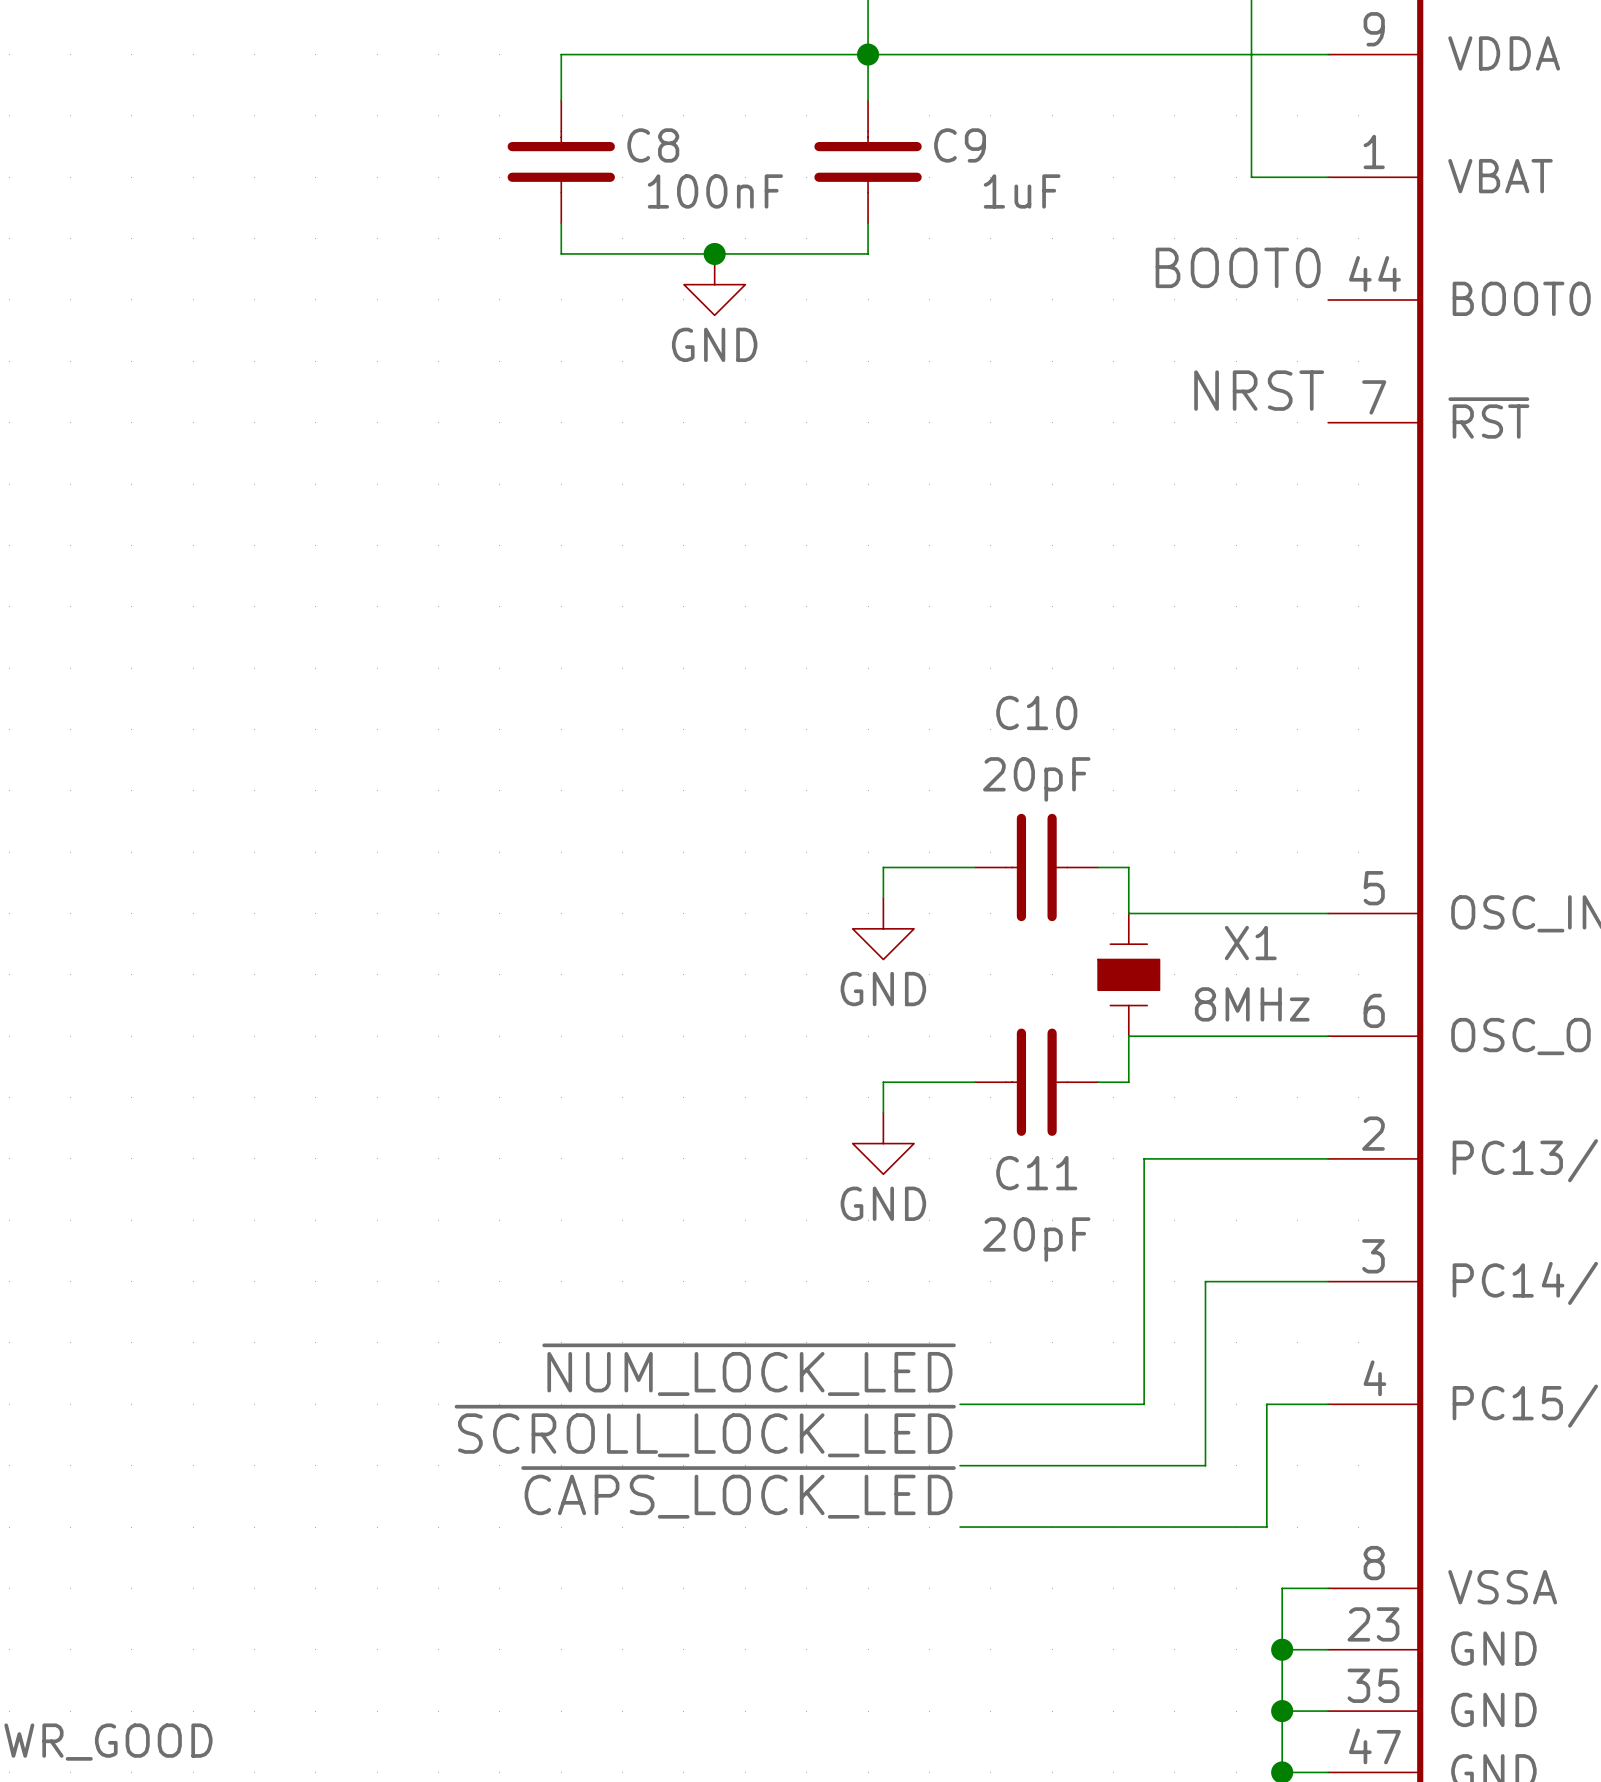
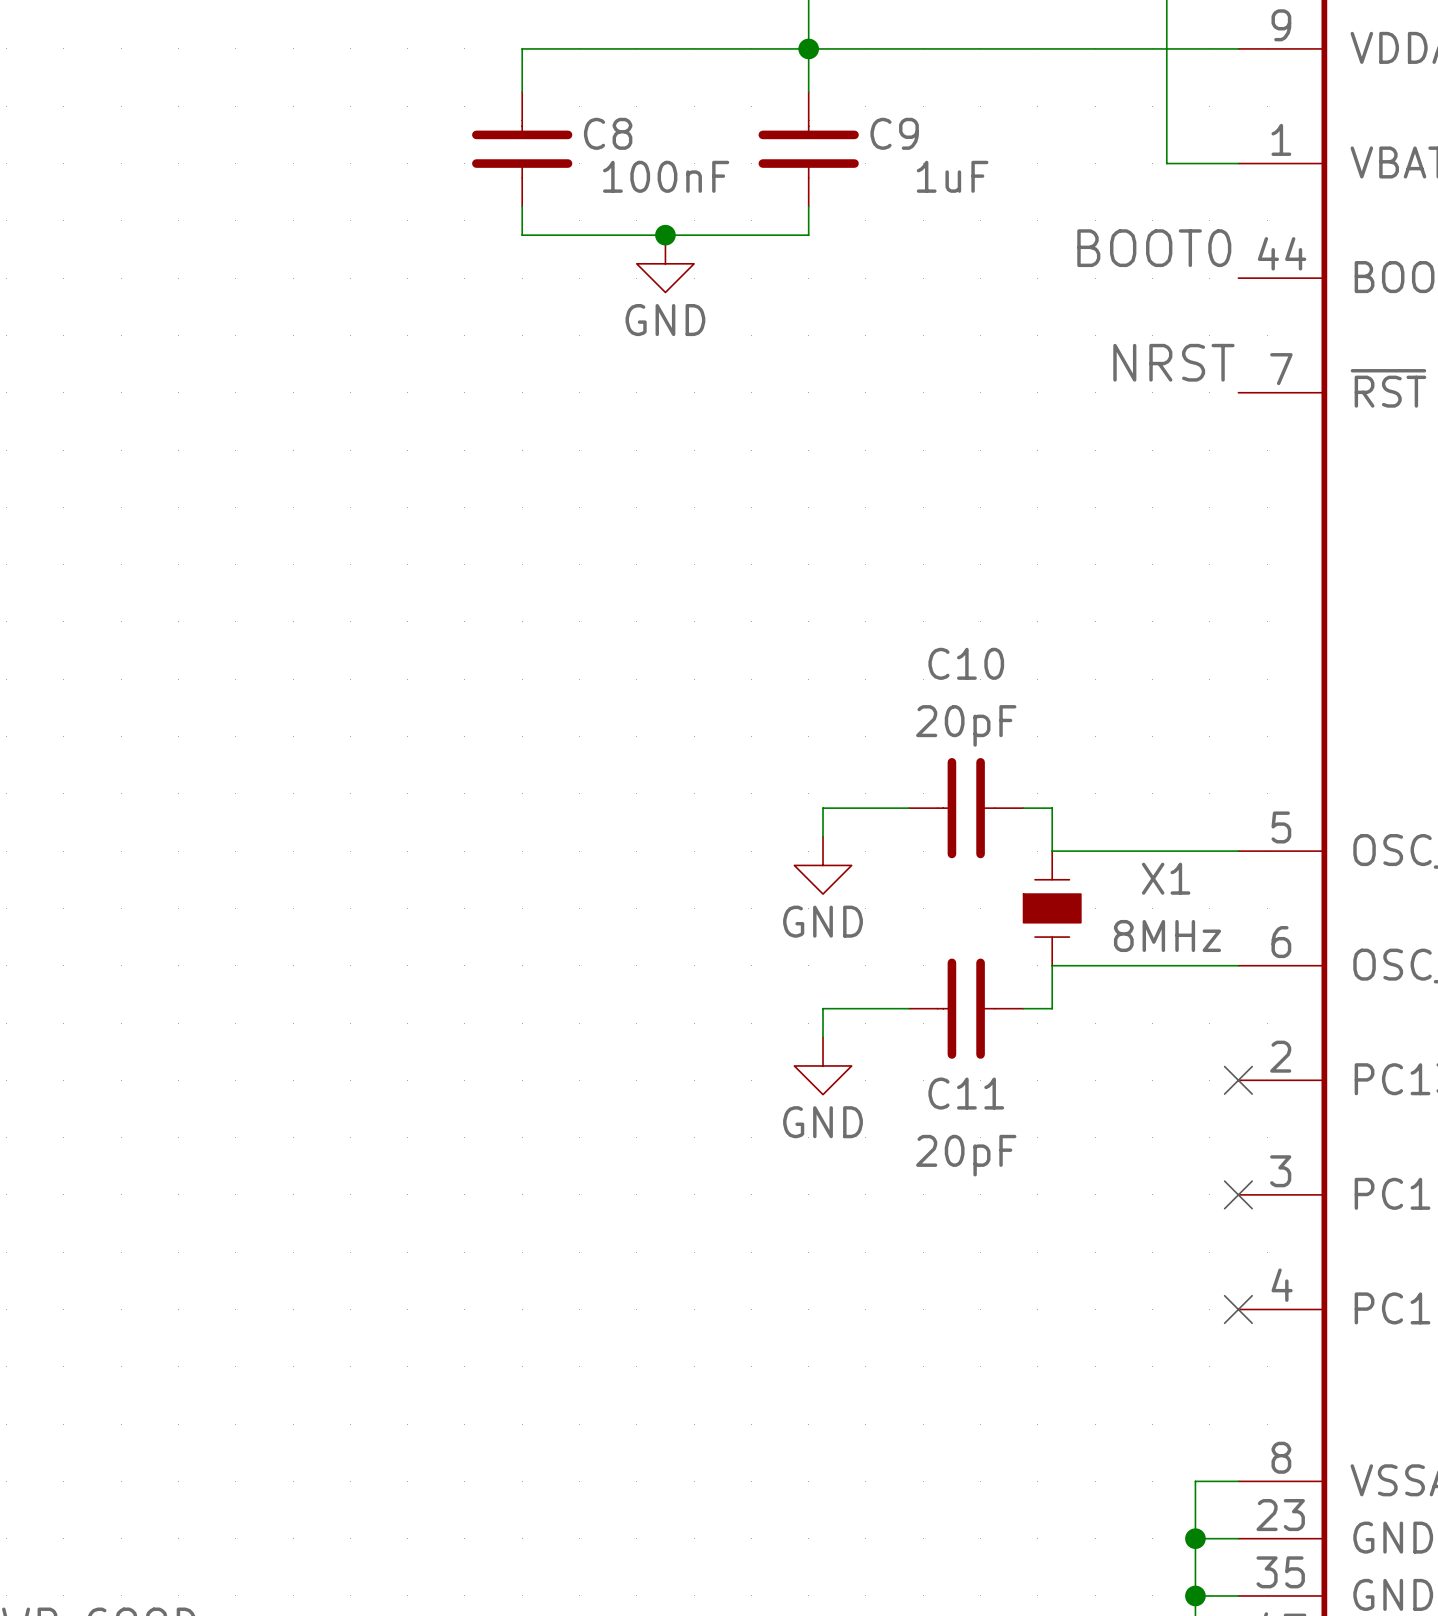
wire: (1328, 1158) (1144, 1158) (1144, 1404) (960, 1404) -> none
no-connect mark: none -> (1238, 1080)
wire: (1328, 1281) (1205, 1281) (1205, 1465) (960, 1465) -> none
no-connect mark: none -> (1238, 1194)
label: ~{NUM_LOCK_LED} (749, 1369) -> none
wire: (1328, 1404) (1266, 1404) (1266, 1527) (960, 1527) -> none
no-connect mark: none -> (1238, 1309)
label: ~{SCROLL_LOCK_LED} (705, 1431) -> none
label: ~{CAPS_LOCK_LED} (738, 1492) -> none

